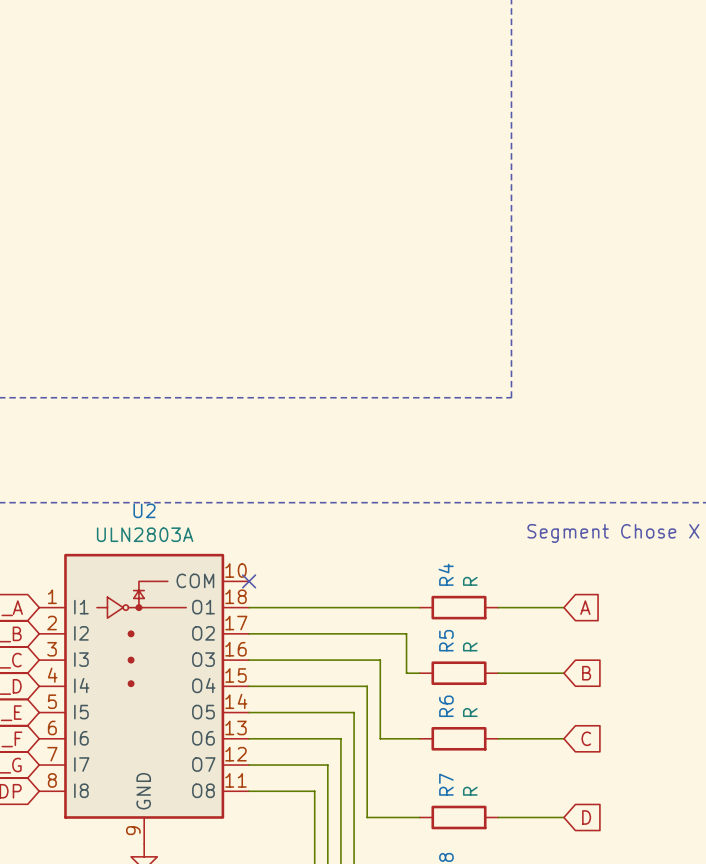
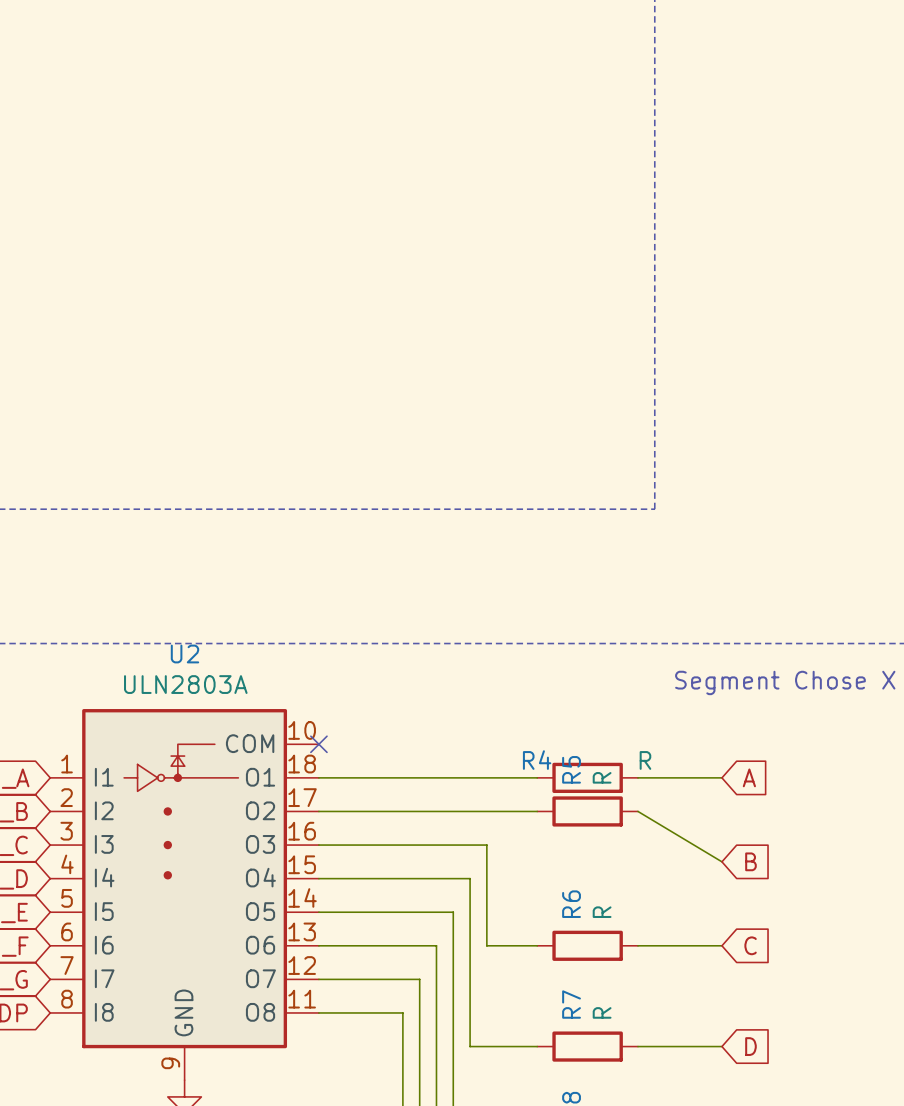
R4 name rotation: 0° (446, 574) -> 90° clockwise (537, 760)
R4 name position: R4 (446, 574) -> R4 (537, 760)
R4 value rotation: 0° (470, 581) -> 90° clockwise (645, 760)
R4 value position: R (470, 581) -> R (645, 760)
wire: (406, 633) (406, 673) (419, 673) -> (520, 811) (537, 811)
R5 position: (459, 673) -> (587, 811)
wire: (498, 673) (563, 673) -> (638, 811) (721, 861)

